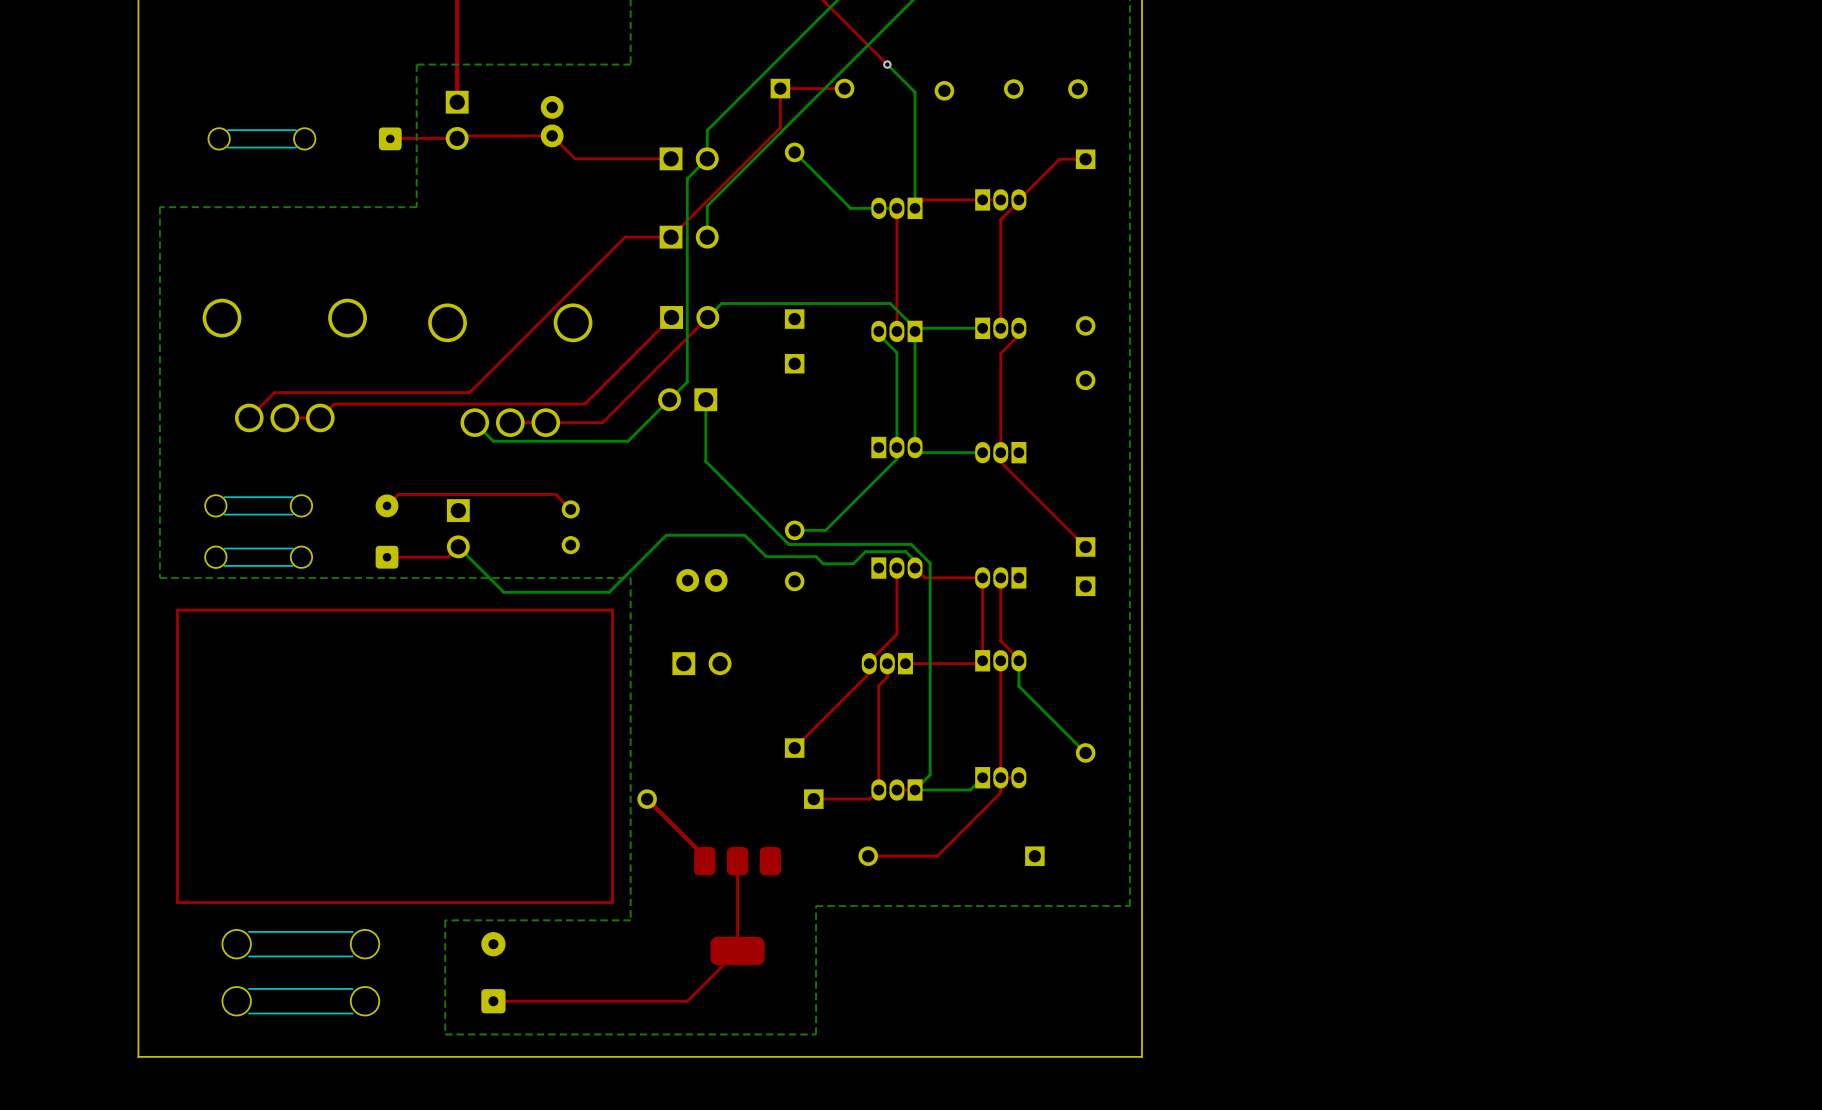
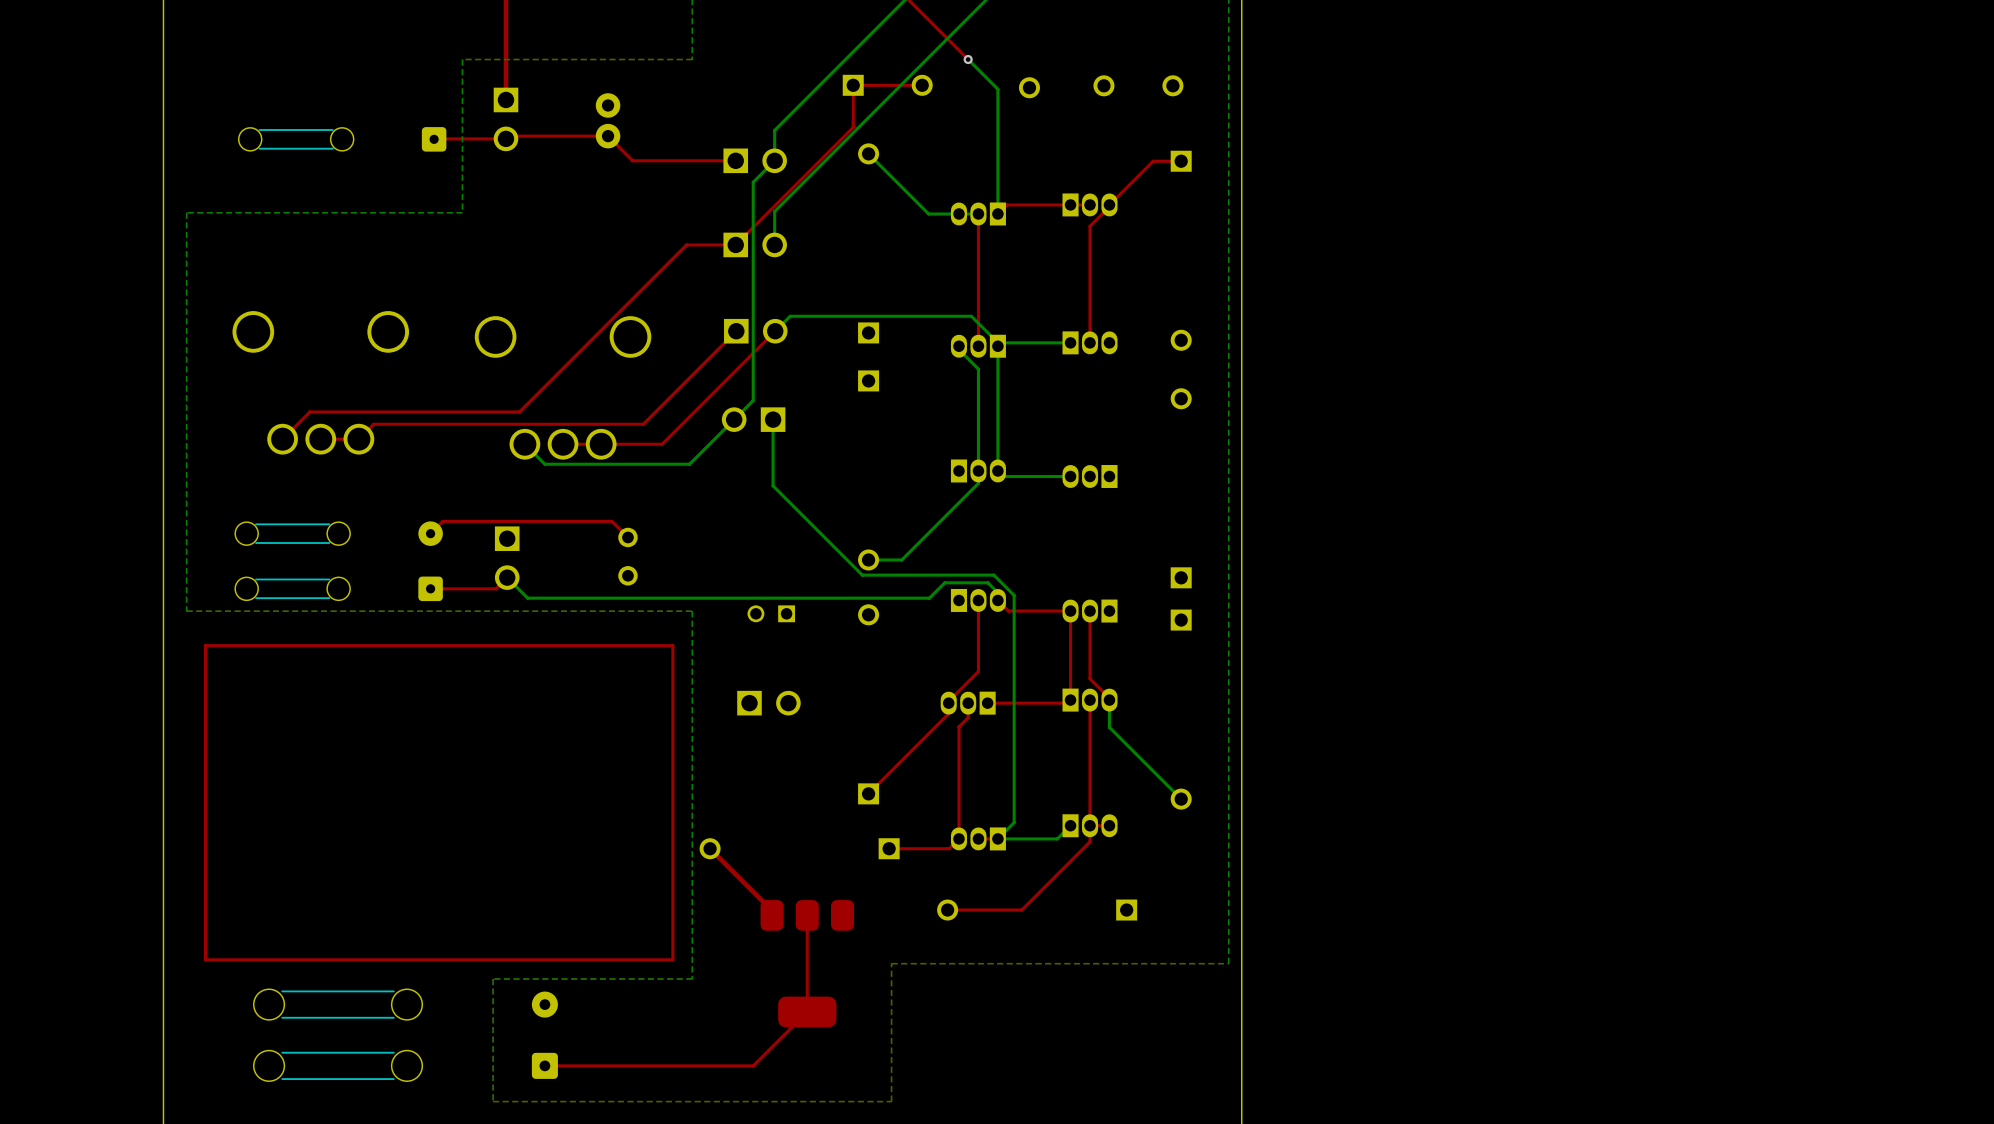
top track: (1018, 328) (1018, 335) (1000, 353) (1000, 462) (1085, 546) -> none
bottom track: (853, 563) (823, 563) (816, 556) (766, 556) (744, 535) (666, 535) (609, 592) (503, 592) (477, 565) -> (931, 595) (929, 598) (527, 598)
part footprint: [676, 569, 728, 592] -> [747, 605, 796, 623]

